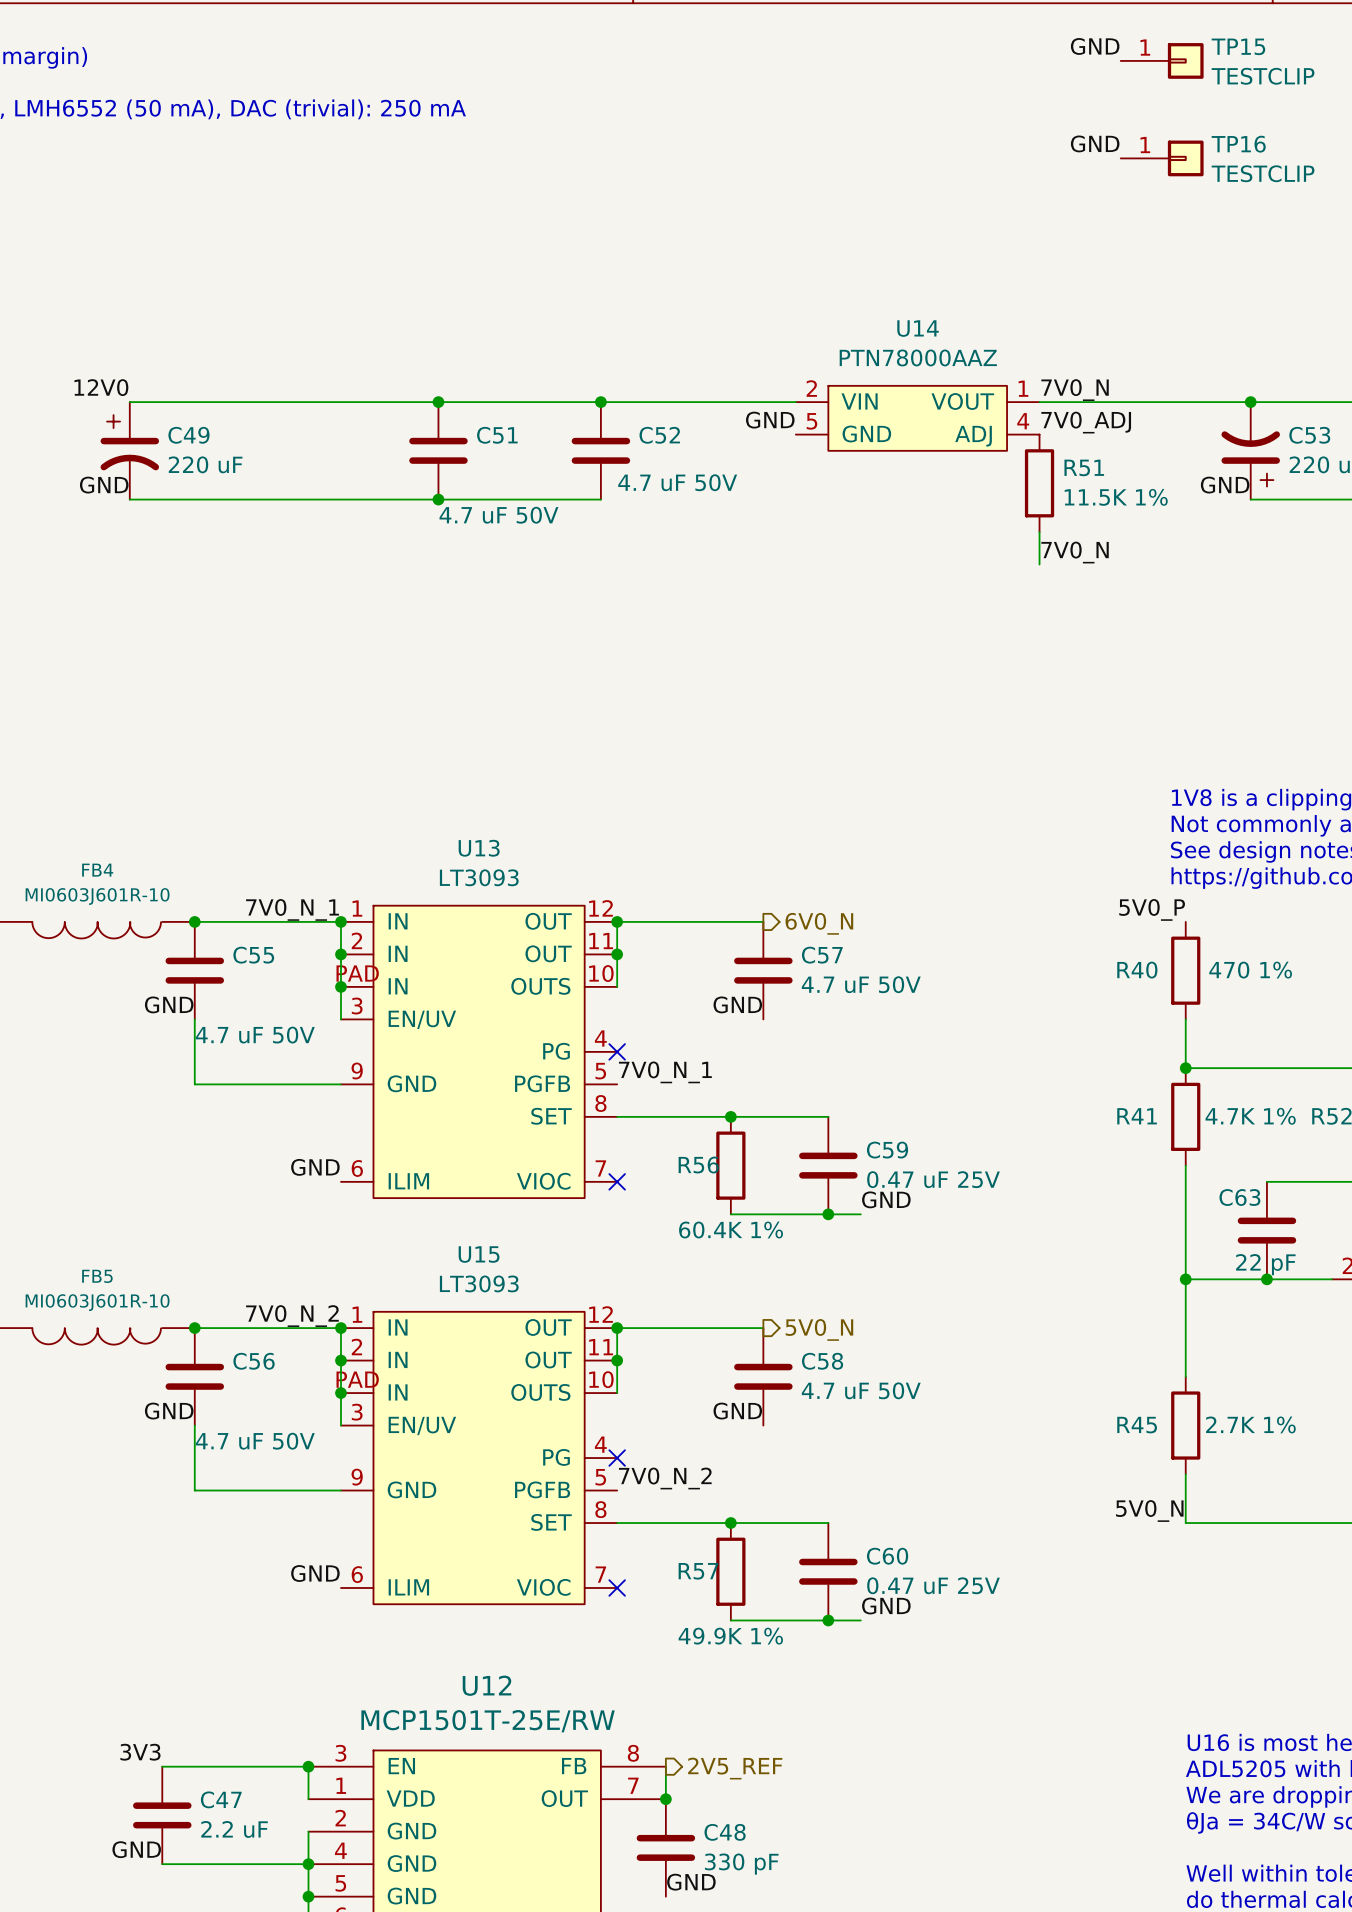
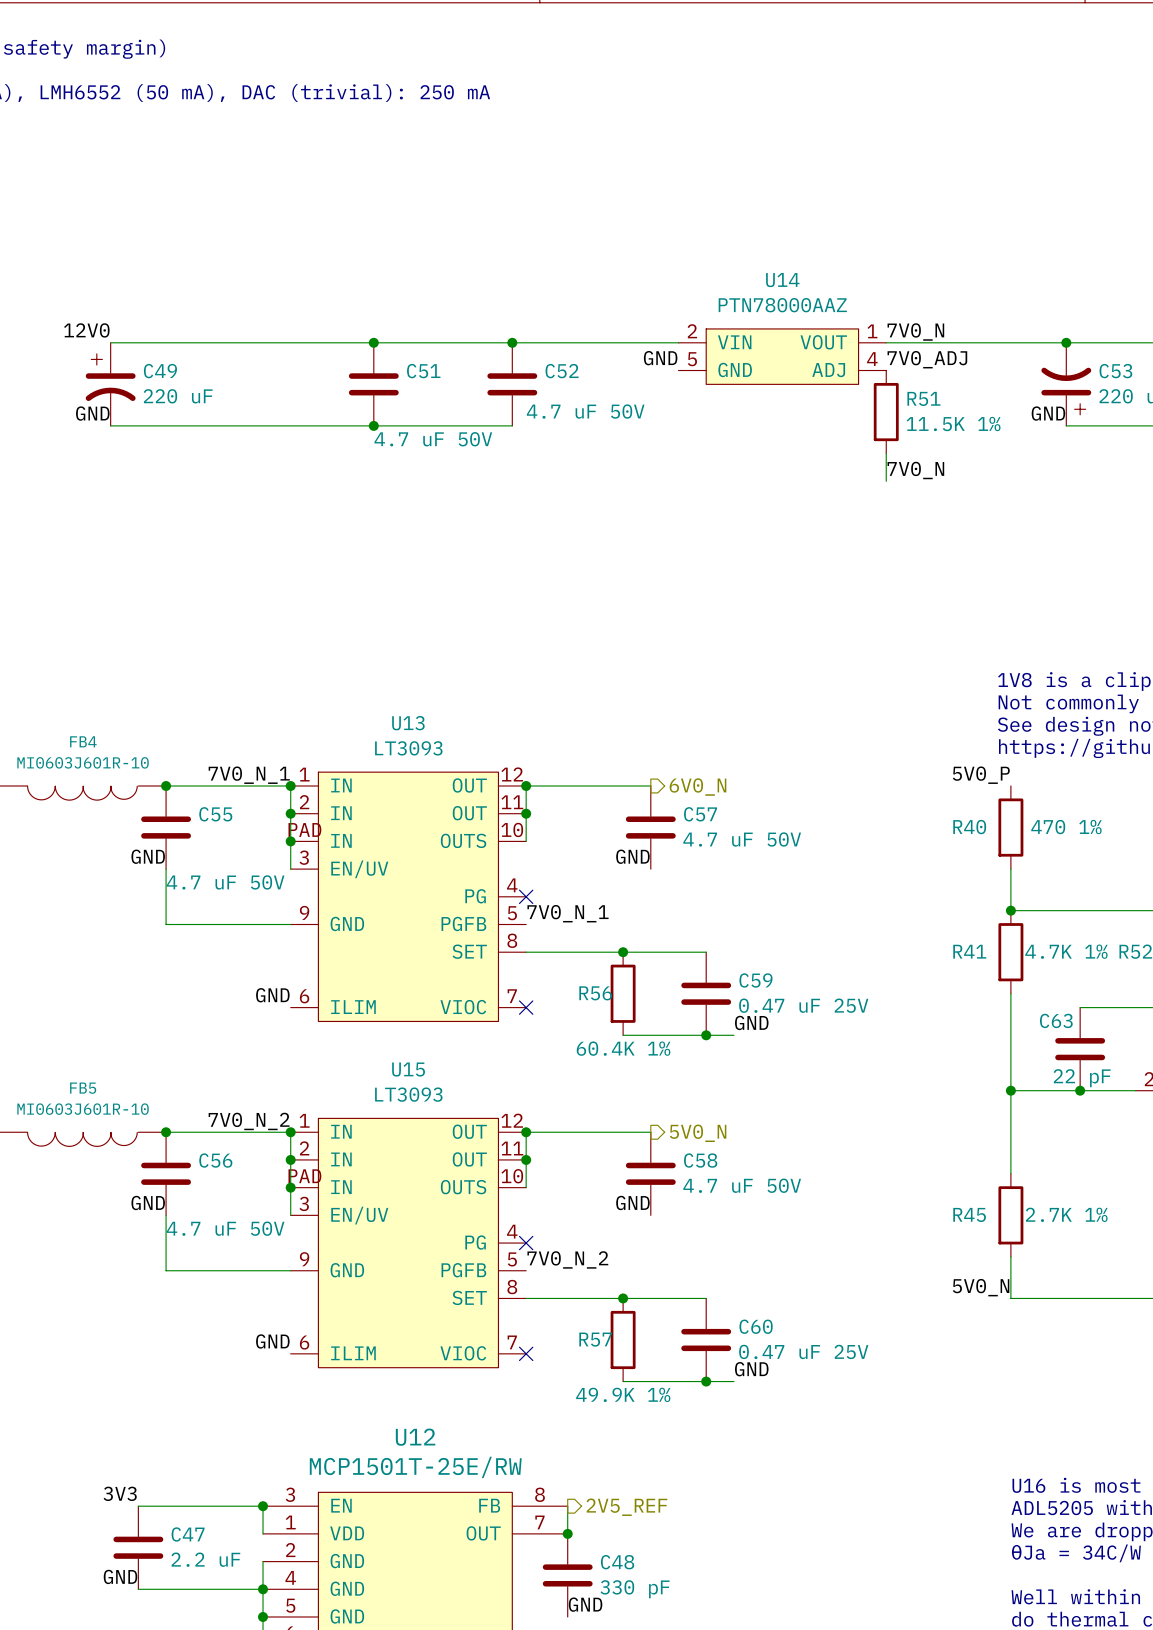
label: GND (1095, 46) -> none
TP15: TESTCLIP (1162, 60) -> none
label: GND (1095, 143) -> none
TP16: TESTCLIP (1162, 158) -> none

